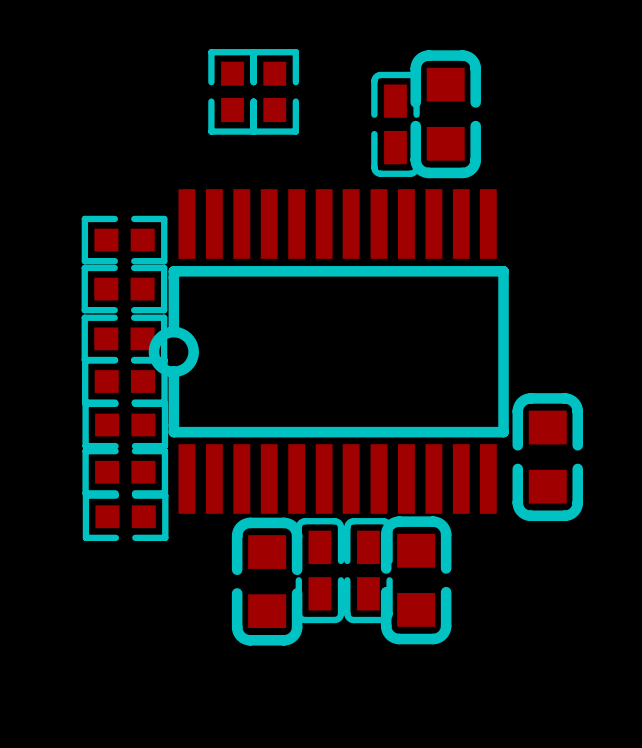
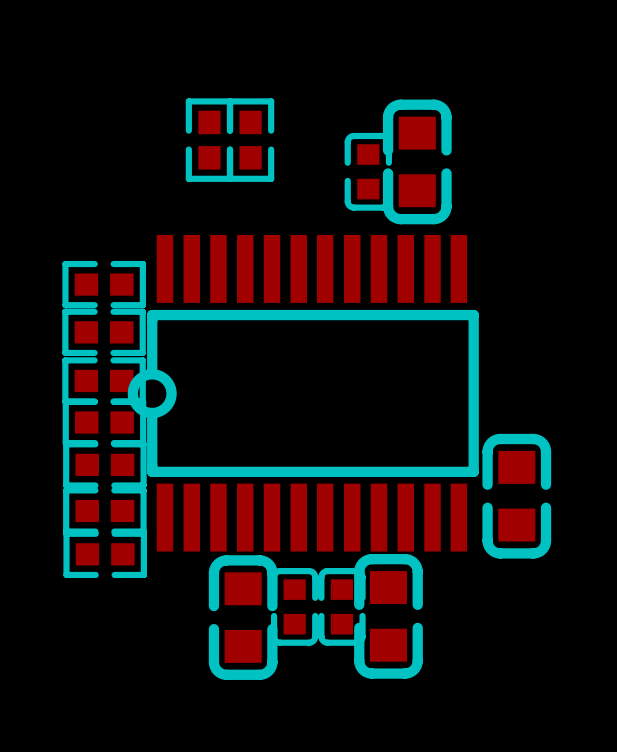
part footprint: [371, 71, 420, 177] -> [344, 132, 392, 211]
part footprint: [295, 518, 345, 624] -> [270, 568, 319, 646]
part footprint: [344, 518, 393, 624] -> [318, 568, 366, 646]

